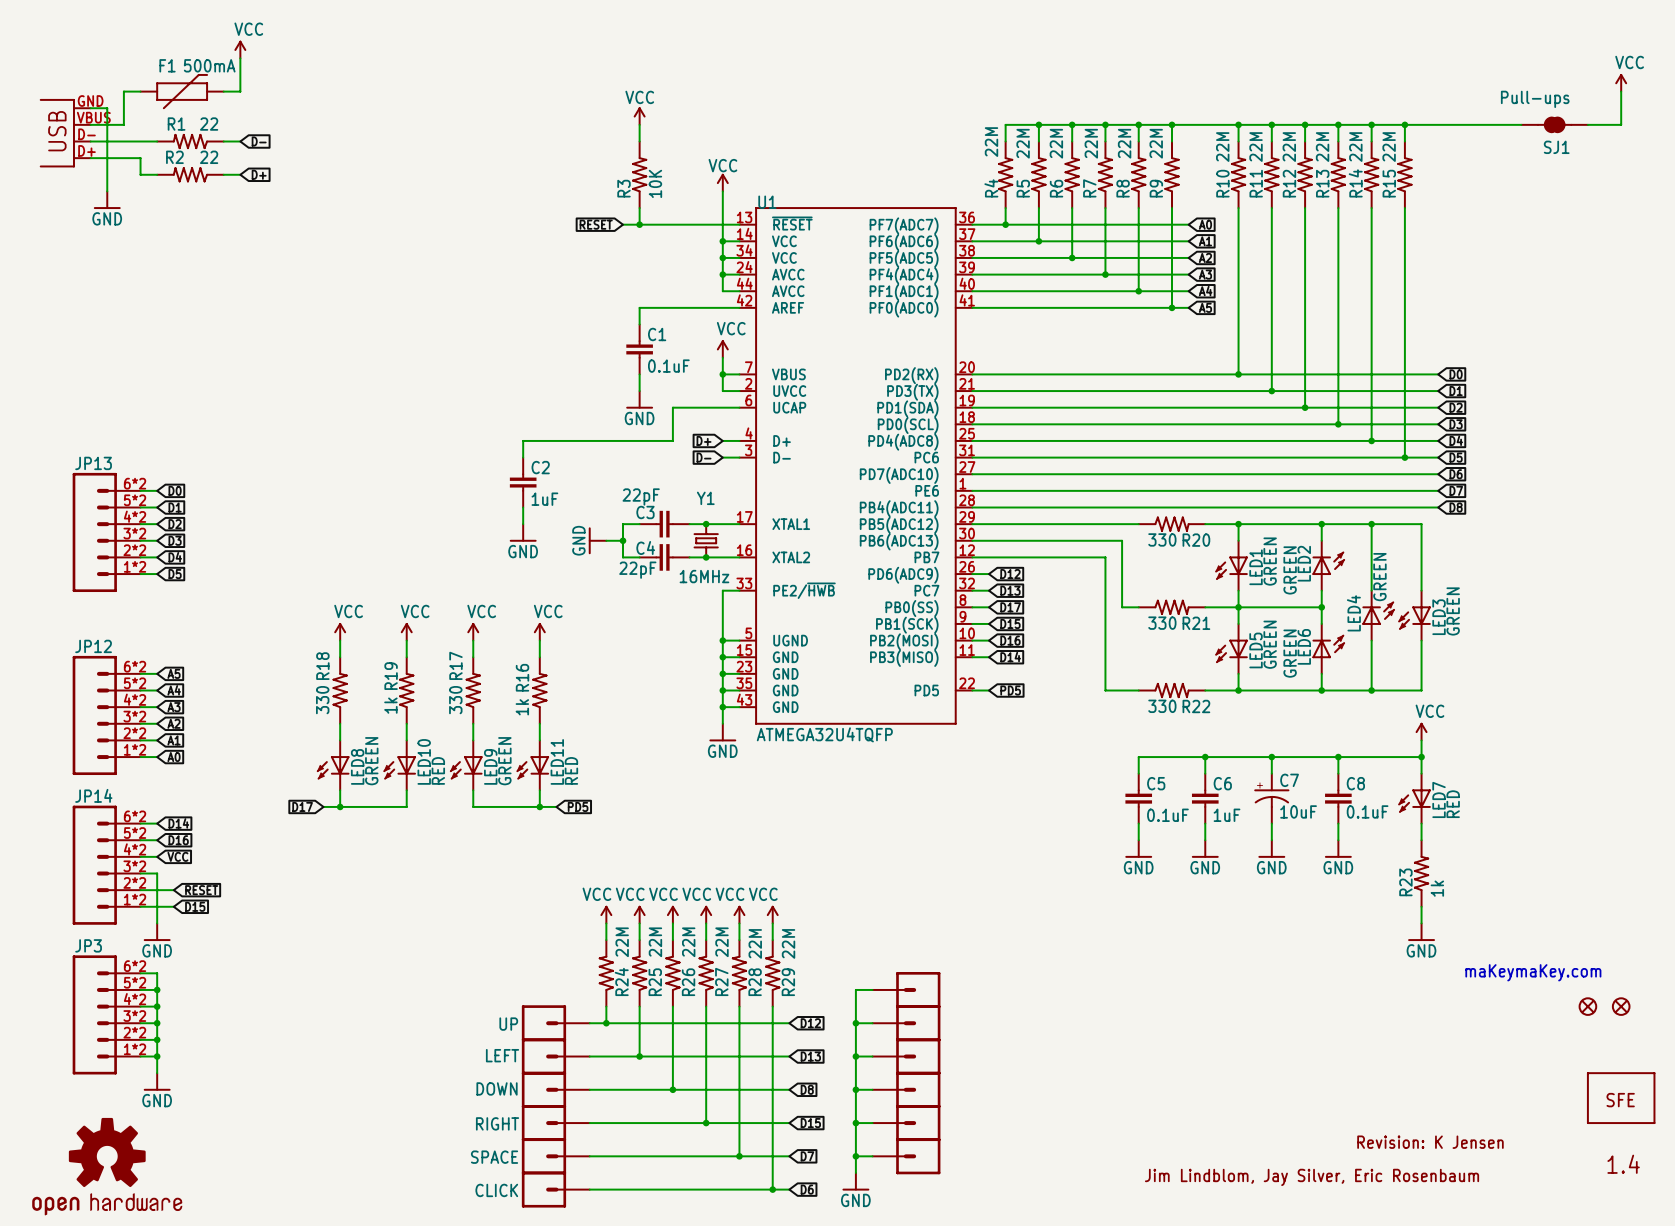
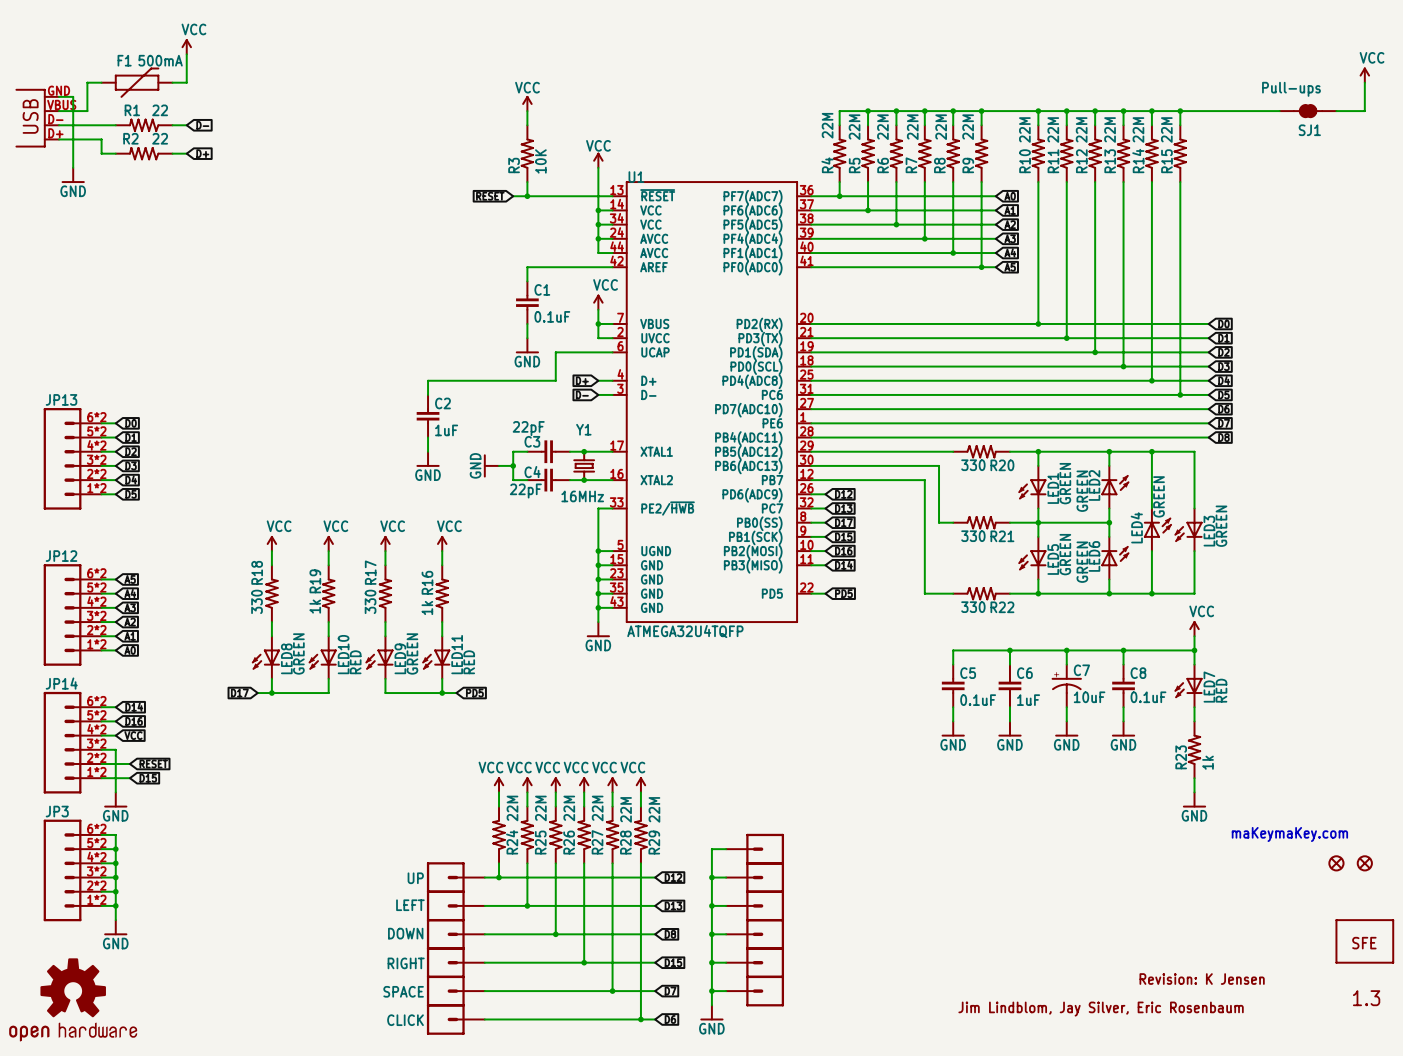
text: 1.4 (1623, 1164) -> 1.3 (1366, 998)

